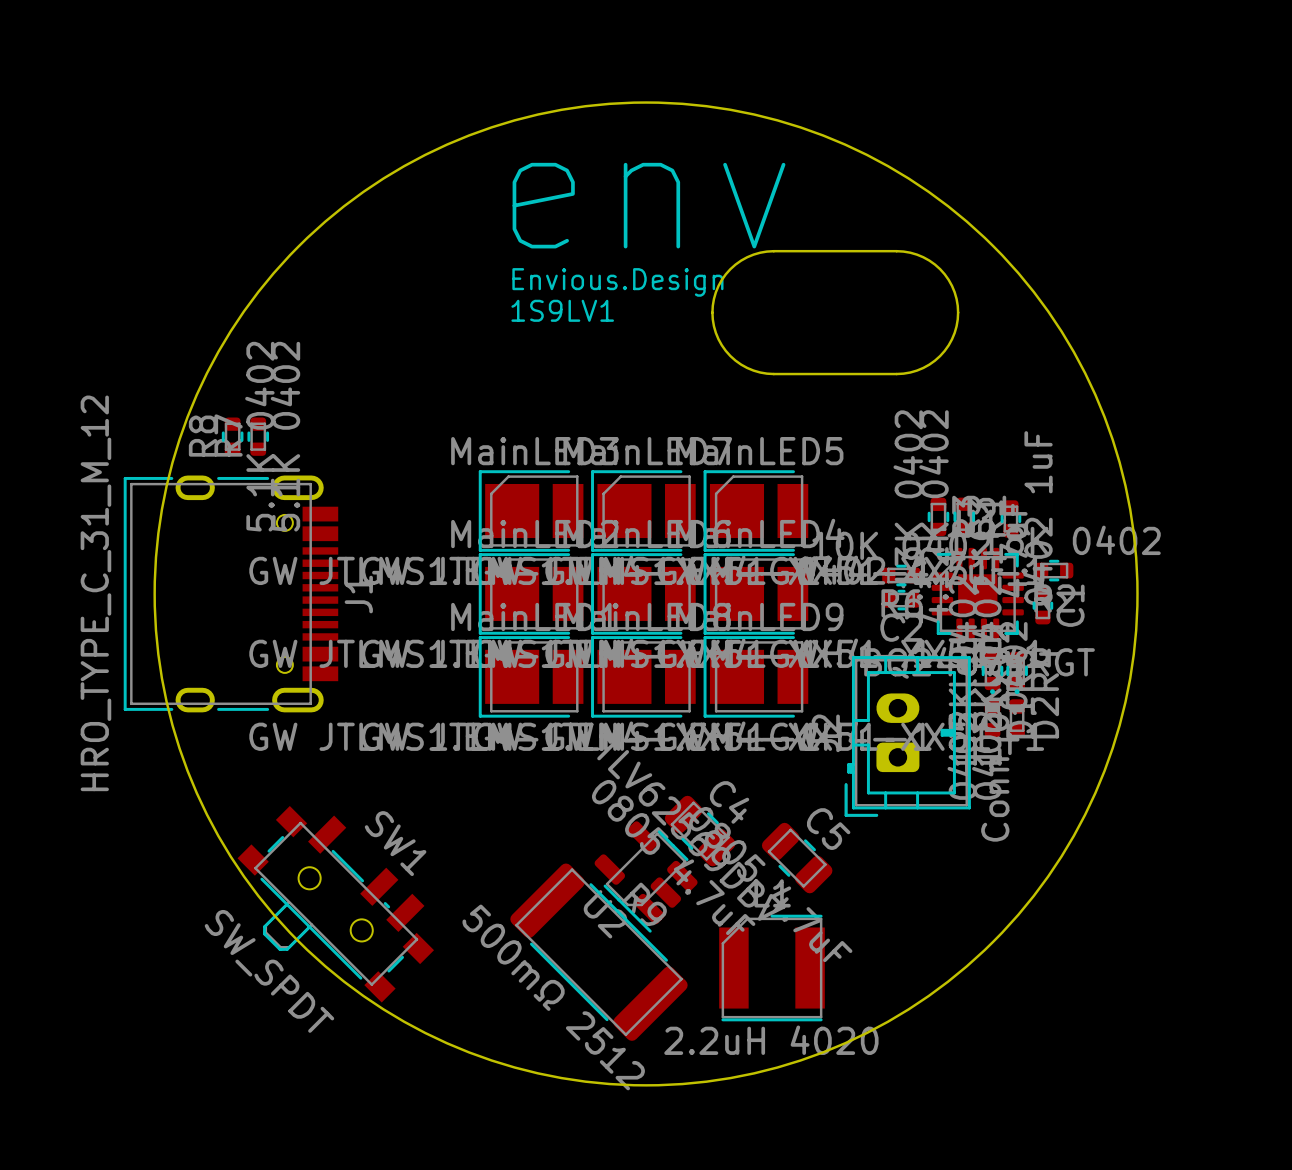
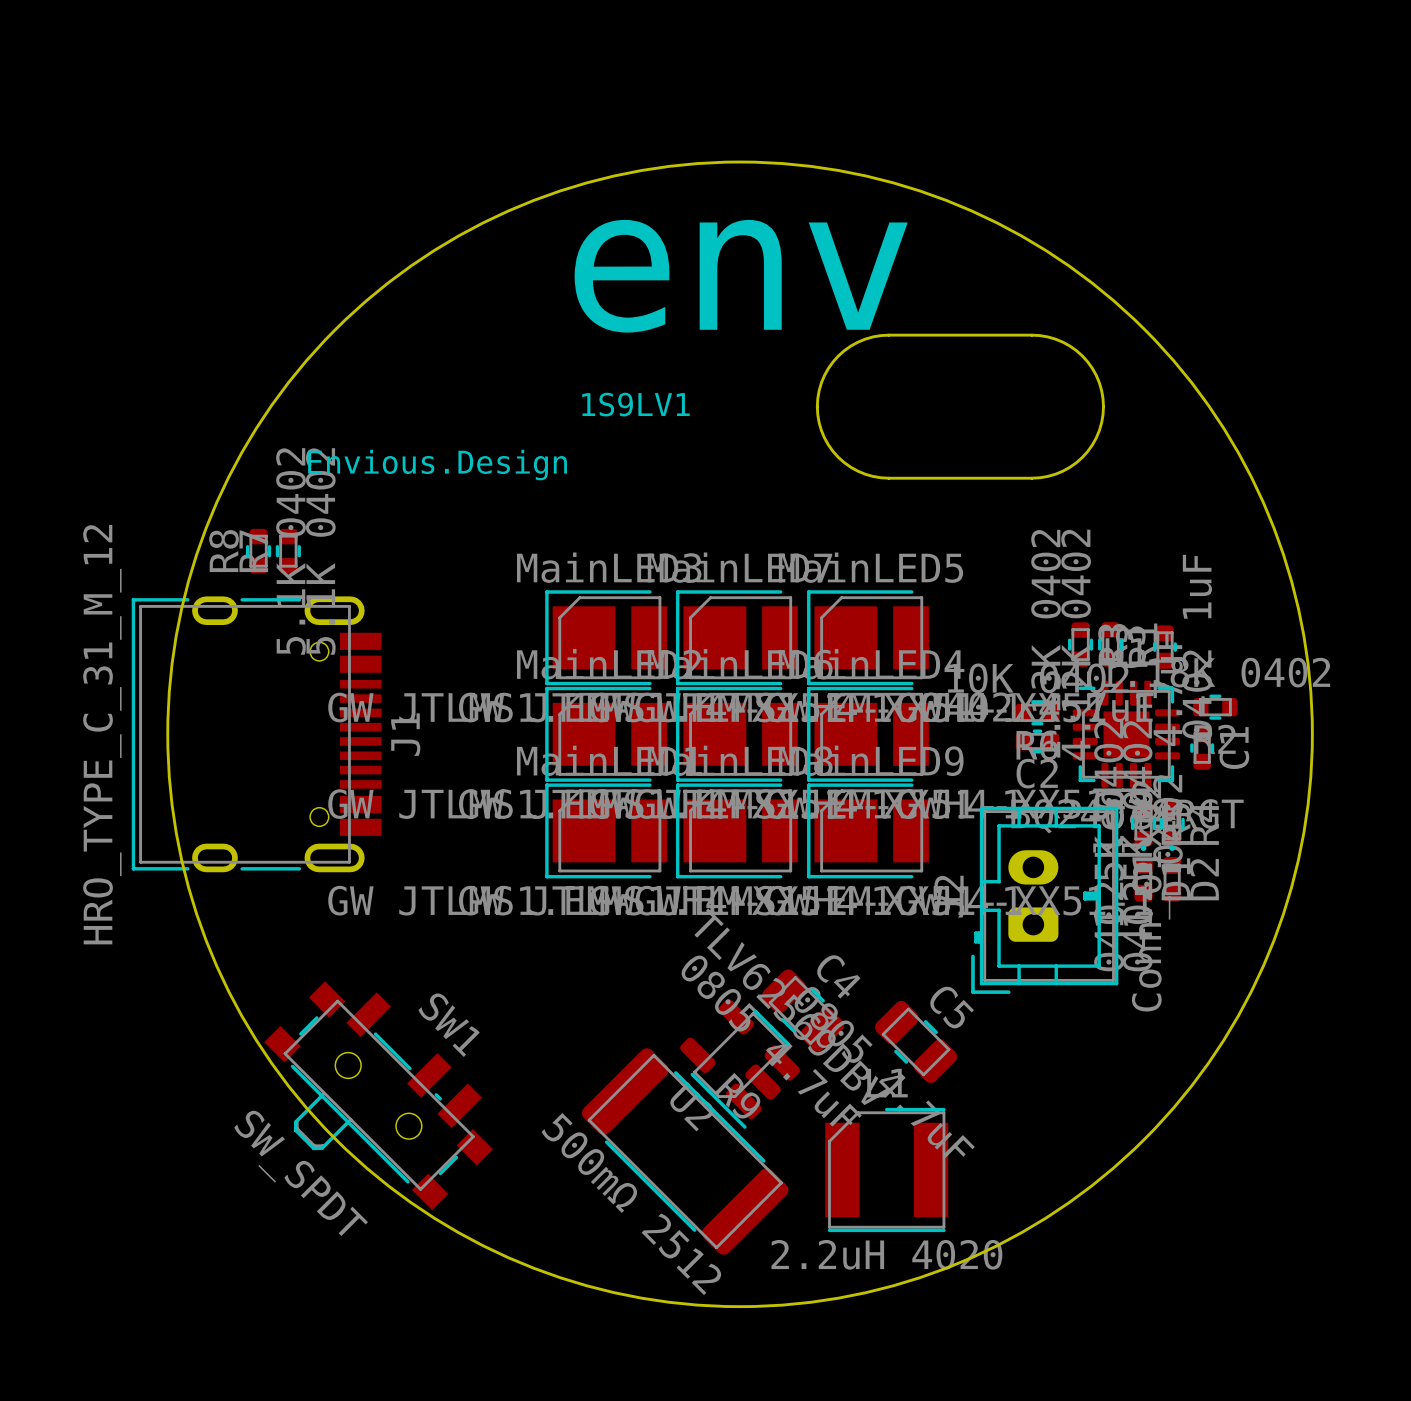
text position: Envious.Design (617, 282) -> Envious.Design (437, 465)

